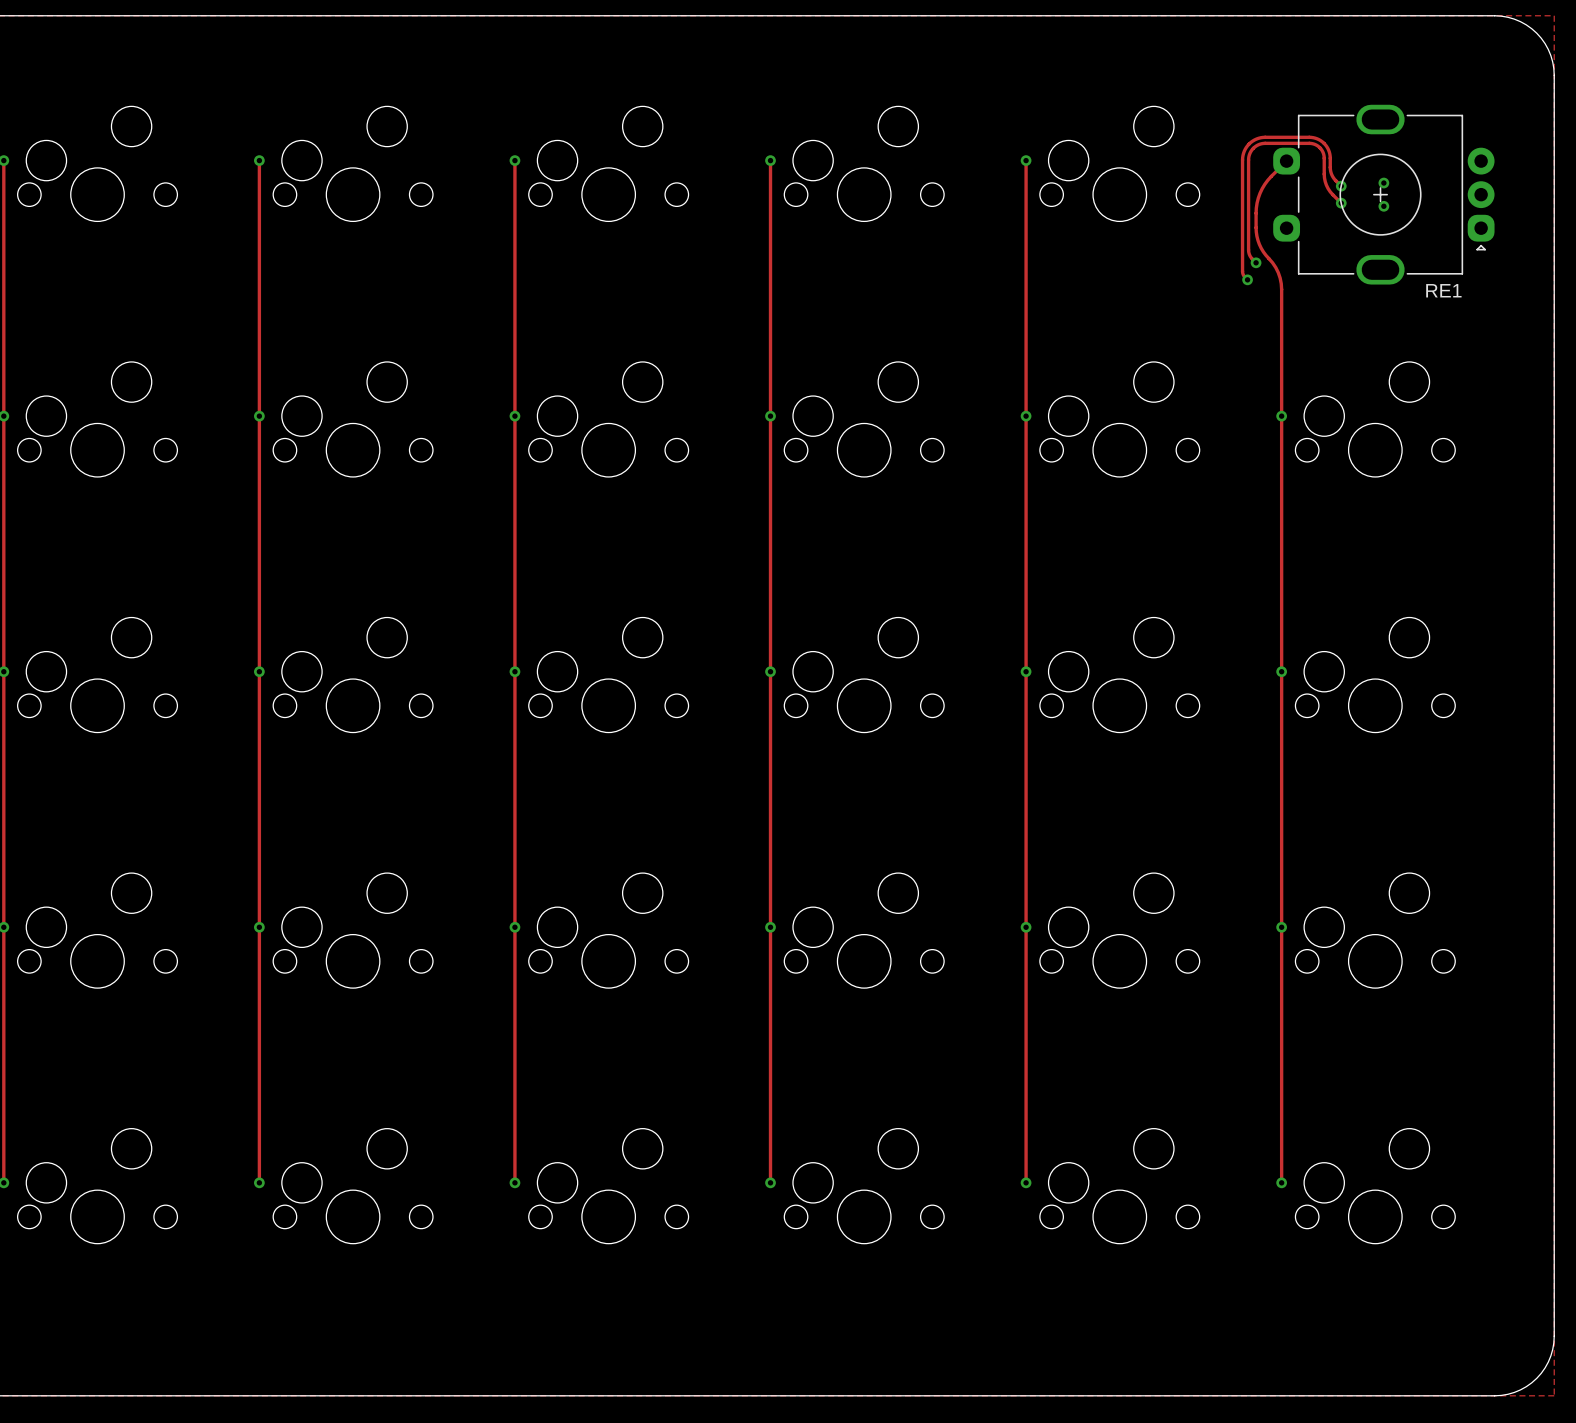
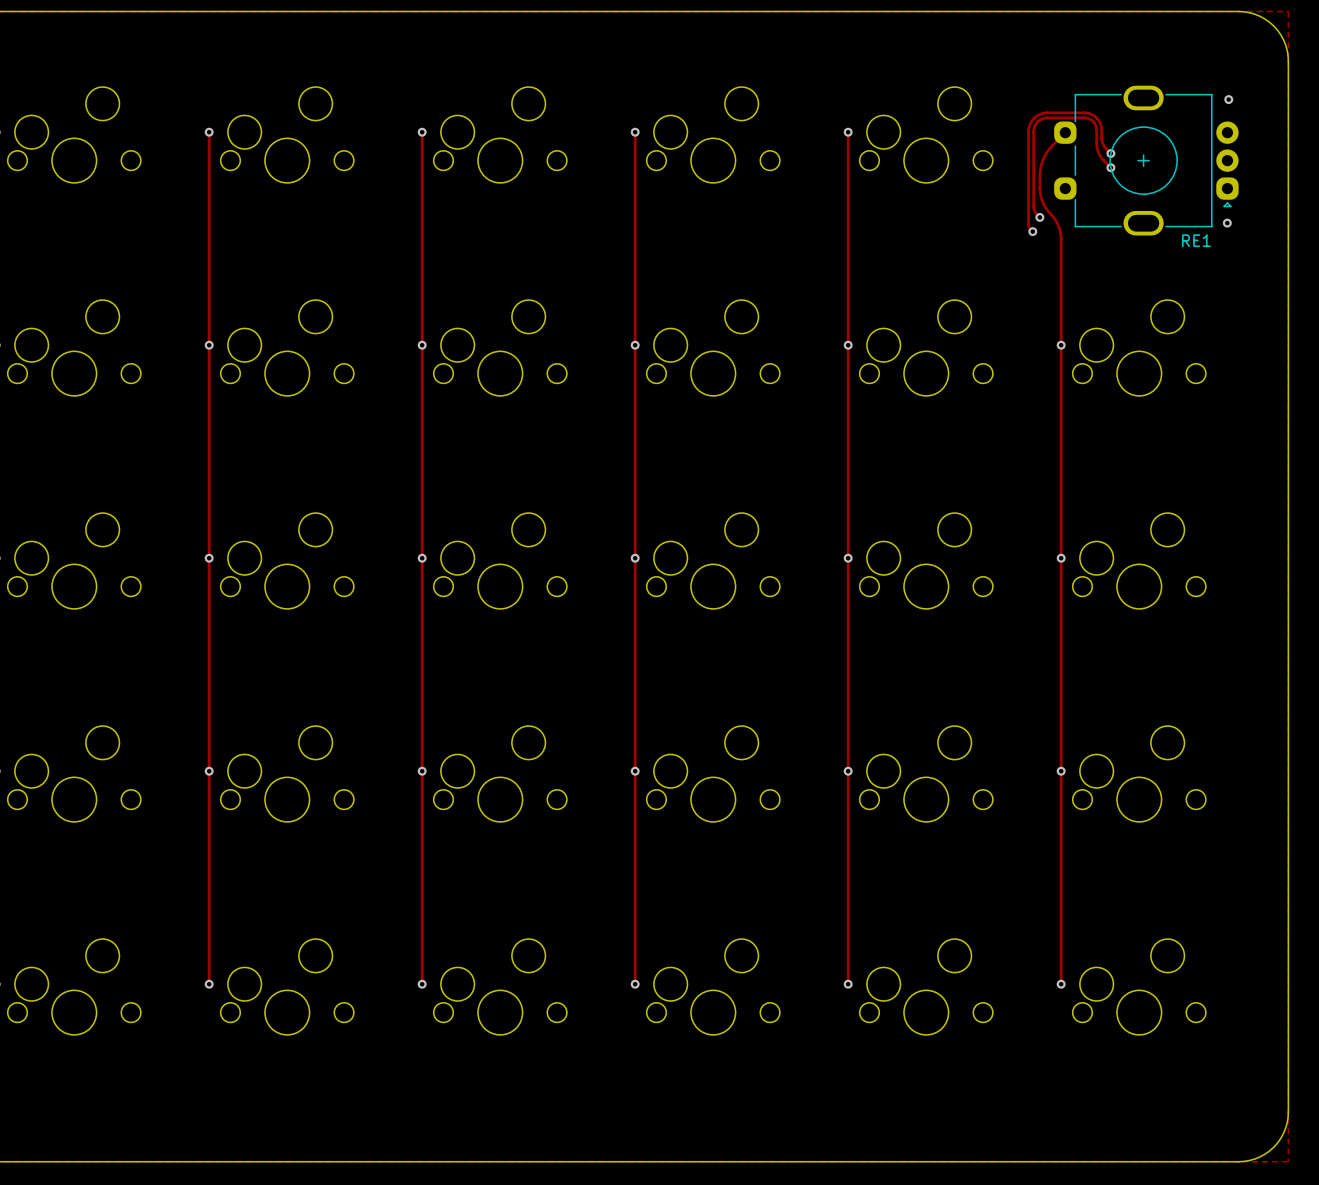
via: none -> (1228, 99)
via: (1383, 183) -> none
via: (1383, 206) -> none
via: none -> (1227, 223)

